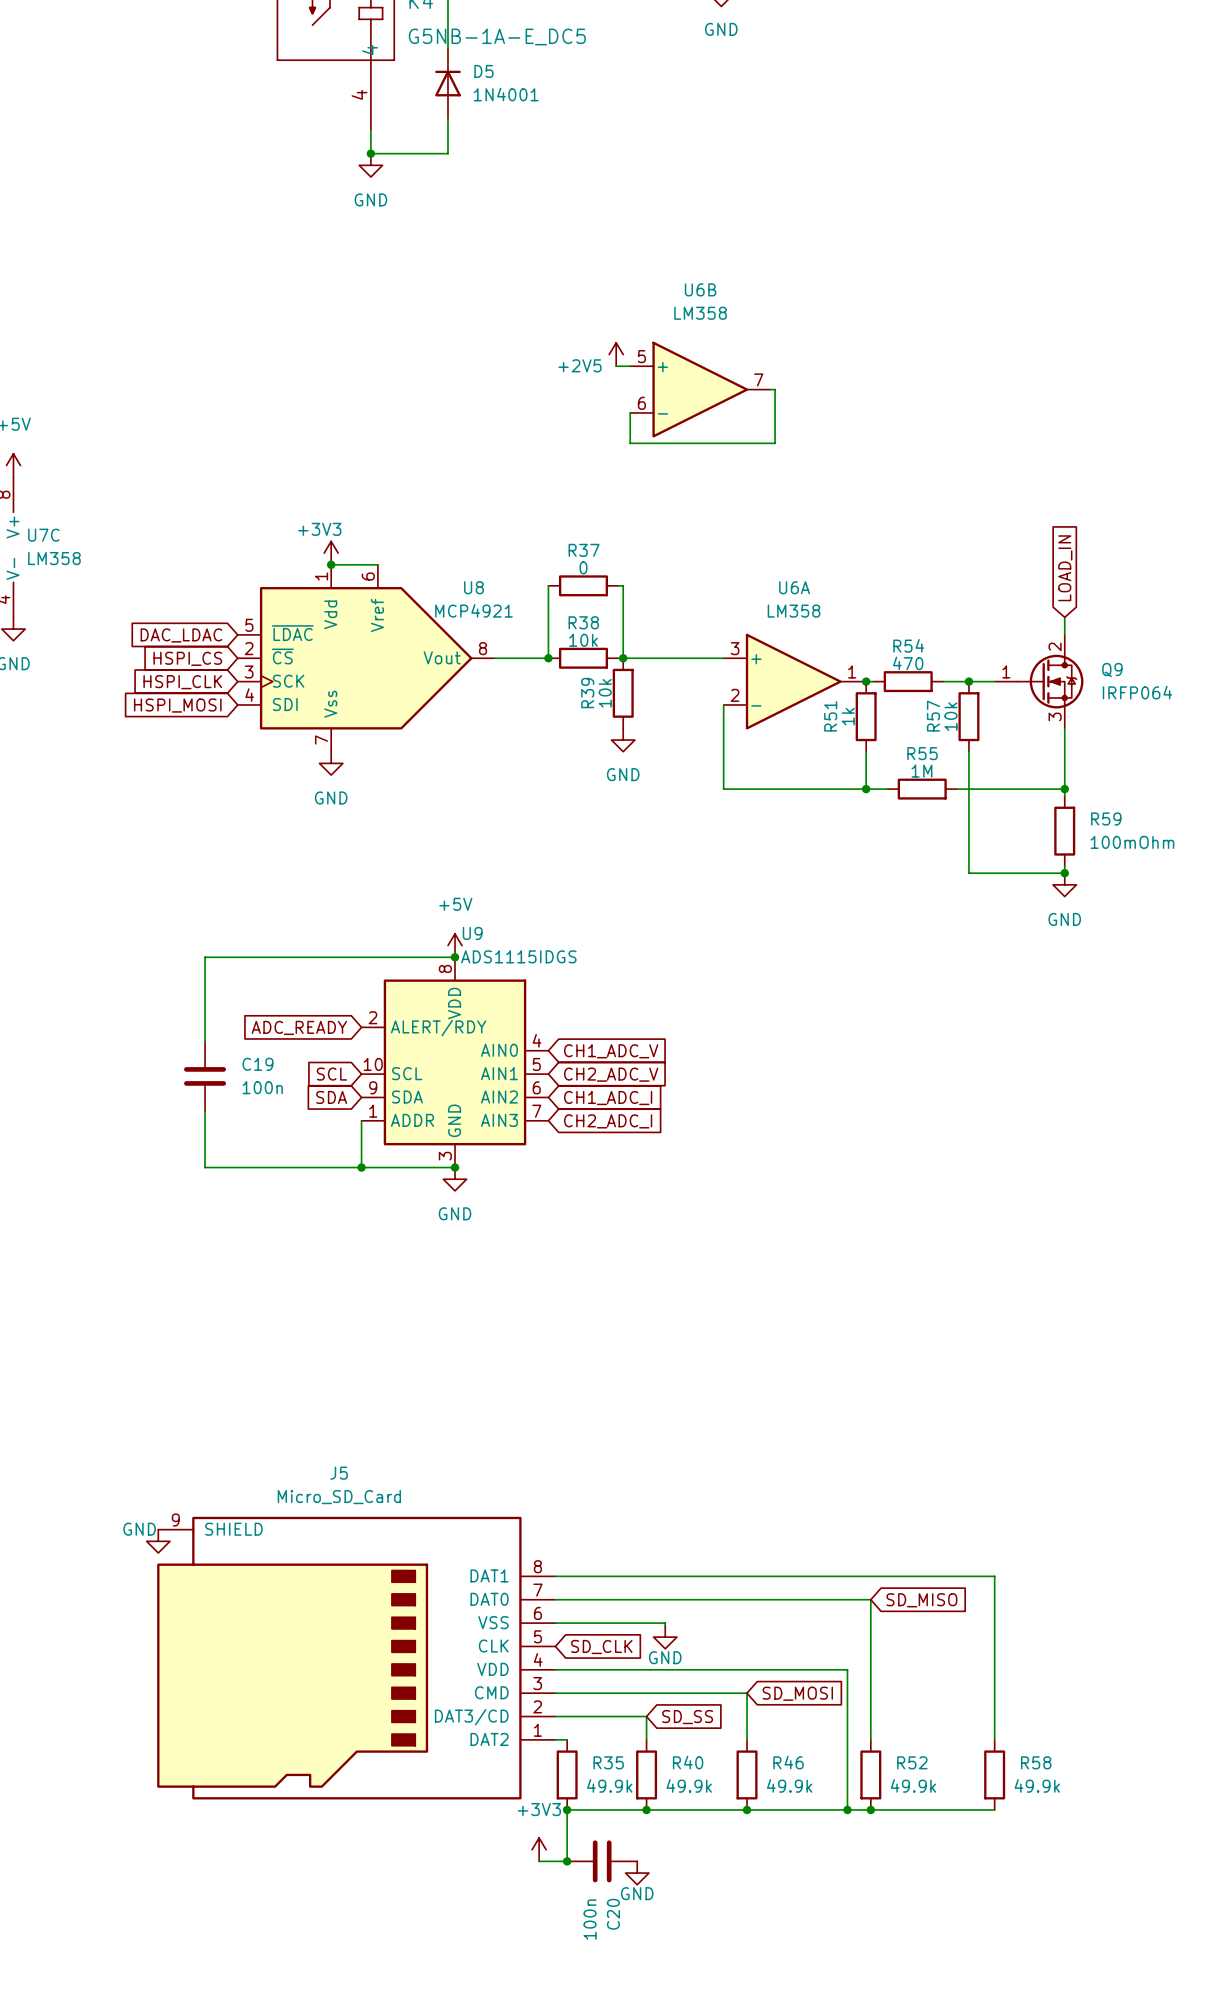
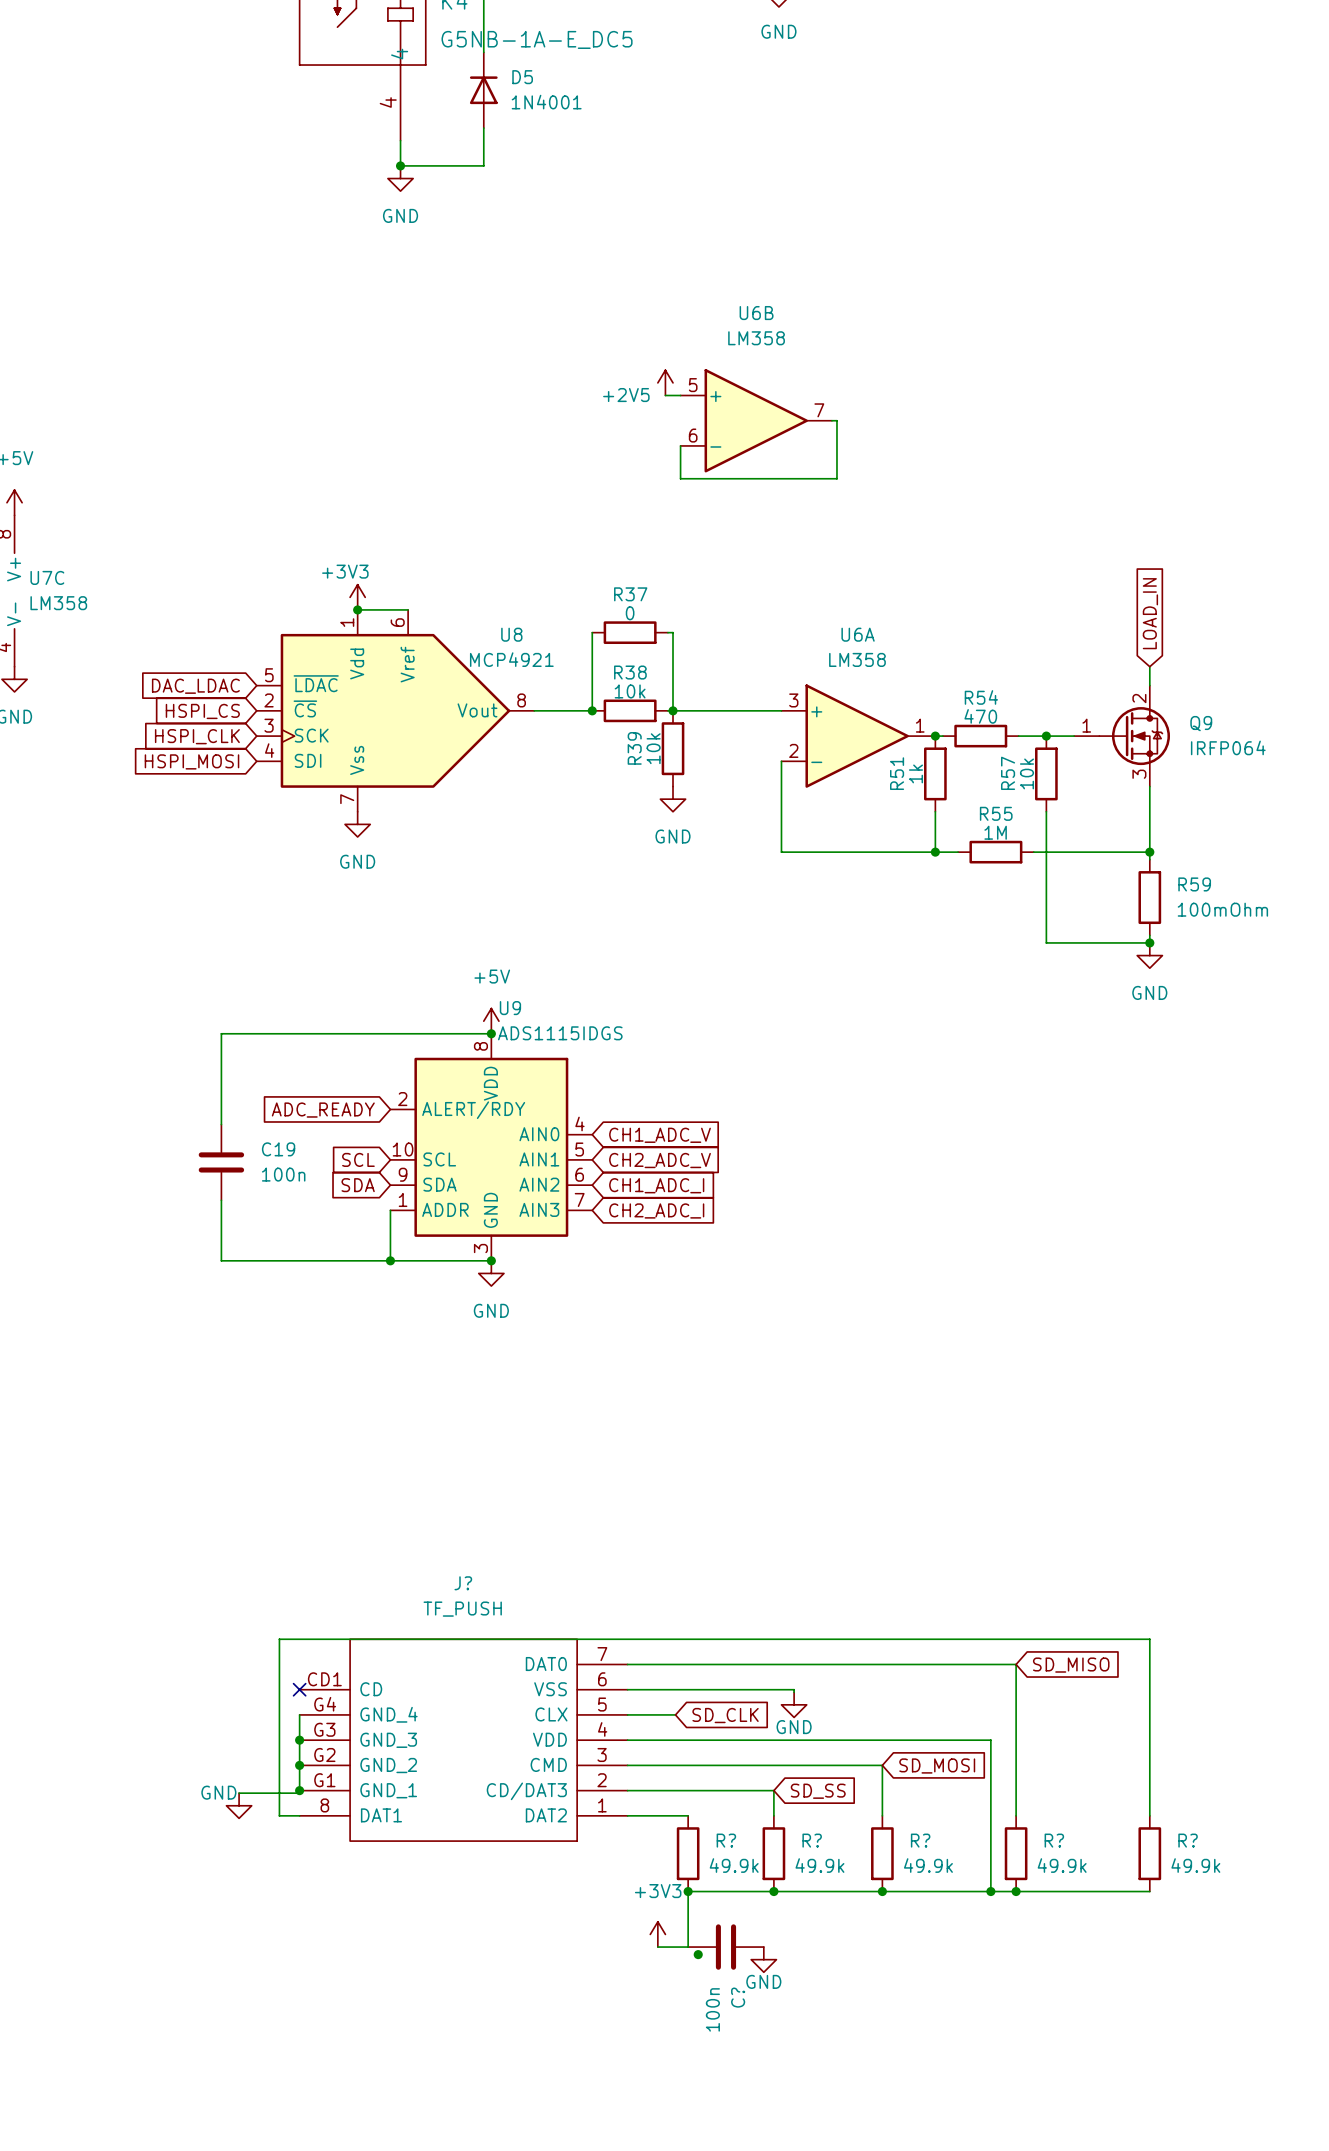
power symbol position: GND (158, 1541) -> GND (239, 1805)
wire: none -> (627, 1664) (1016, 1664) (1016, 1815)
no-connect mark: none -> (299, 1689)
wire: none -> (627, 1689) (794, 1689) (794, 1692)
wire: (555, 1576) (994, 1576) (994, 1739) -> none
power symbol: none -> GND (794, 1704)
wire: none -> (627, 1714) (675, 1714)
wire: (555, 1599) (870, 1599) (870, 1739) -> none
global label position: SD_MISO (921, 1600) -> SD_MISO (1071, 1665)
junction: none -> (299, 1740)
J?: none -> TF_PUSH (463, 1740)
wire: none -> (627, 1740) (990, 1740) (990, 1891)
wire: (555, 1623) (665, 1623) (665, 1625) -> none
junction: none -> (299, 1765)
wire: none -> (627, 1765) (882, 1765) (882, 1815)
power symbol: GND (665, 1637) -> none
global label position: SD_CLK (601, 1647) -> SD_CLK (725, 1715)
junction: none -> (299, 1790)
J5: Micro_SD_Card (356, 1658) -> none
wire: none -> (627, 1790) (773, 1790) (773, 1815)
wire: (555, 1669) (847, 1669) (847, 1809) -> none
wire: none -> (299, 1815) (279, 1815) (279, 1639) (1149, 1639) (1149, 1815)
wire: none -> (627, 1815) (688, 1815)
wire: (555, 1693) (747, 1693) (747, 1739) -> none
global label position: SD_MOSI (797, 1693) -> SD_MOSI (937, 1766)
wire: (555, 1716) (646, 1716) (646, 1739) -> none
R?: none -> 49.9k (688, 1853)
R?: none -> 49.9k (773, 1853)
R?: none -> 49.9k (882, 1853)
R?: none -> 49.9k (1016, 1853)
R?: none -> 49.9k (1149, 1853)
global label position: SD_SS (687, 1717) -> SD_SS (818, 1791)
wire: (555, 1739) (567, 1739) -> none
junction: none -> (688, 1891)
junction: none -> (773, 1891)
junction: none -> (882, 1891)
junction: none -> (990, 1891)
junction: none -> (1016, 1891)
R35: 49.9k (567, 1774) -> none
R40: 49.9k (646, 1774) -> none
R46: 49.9k (747, 1774) -> none
R52: 49.9k (870, 1774) -> none
R58: 49.9k (994, 1774) -> none
C?: none -> 100n (725, 1947)
junction: (567, 1809) -> none
junction: (747, 1809) -> none
junction: (847, 1809) -> none
junction: (870, 1809) -> none
wire: (994, 1809) (567, 1809) (567, 1861) (539, 1861) -> (1149, 1891) (688, 1891) (688, 1947) (657, 1947)
power symbol: none -> GND (763, 1959)
power symbol position: +3V3 (539, 1849) -> +3V3 (657, 1934)
junction: (567, 1861) -> none
C20: 100n (602, 1861) -> none
power symbol: GND (637, 1873) -> none

